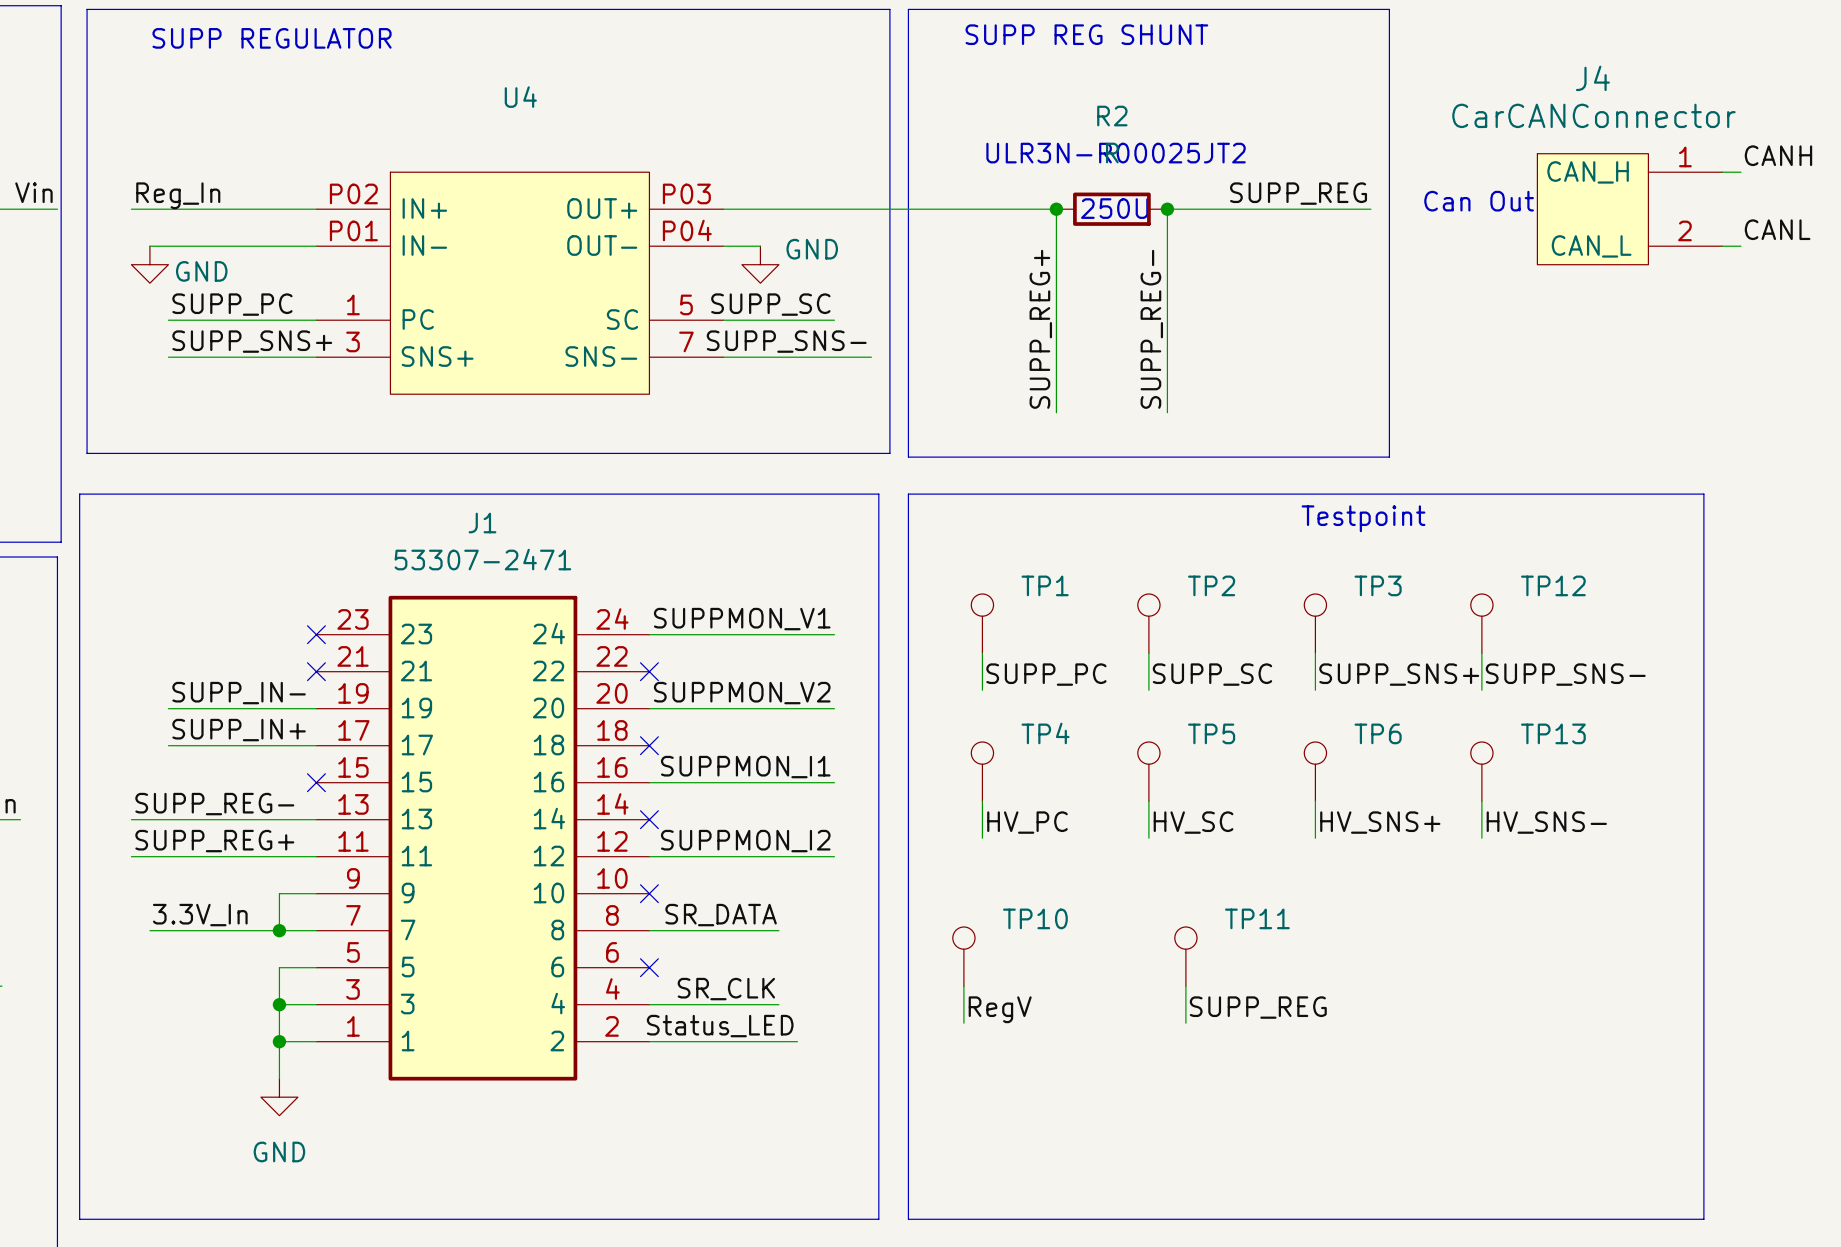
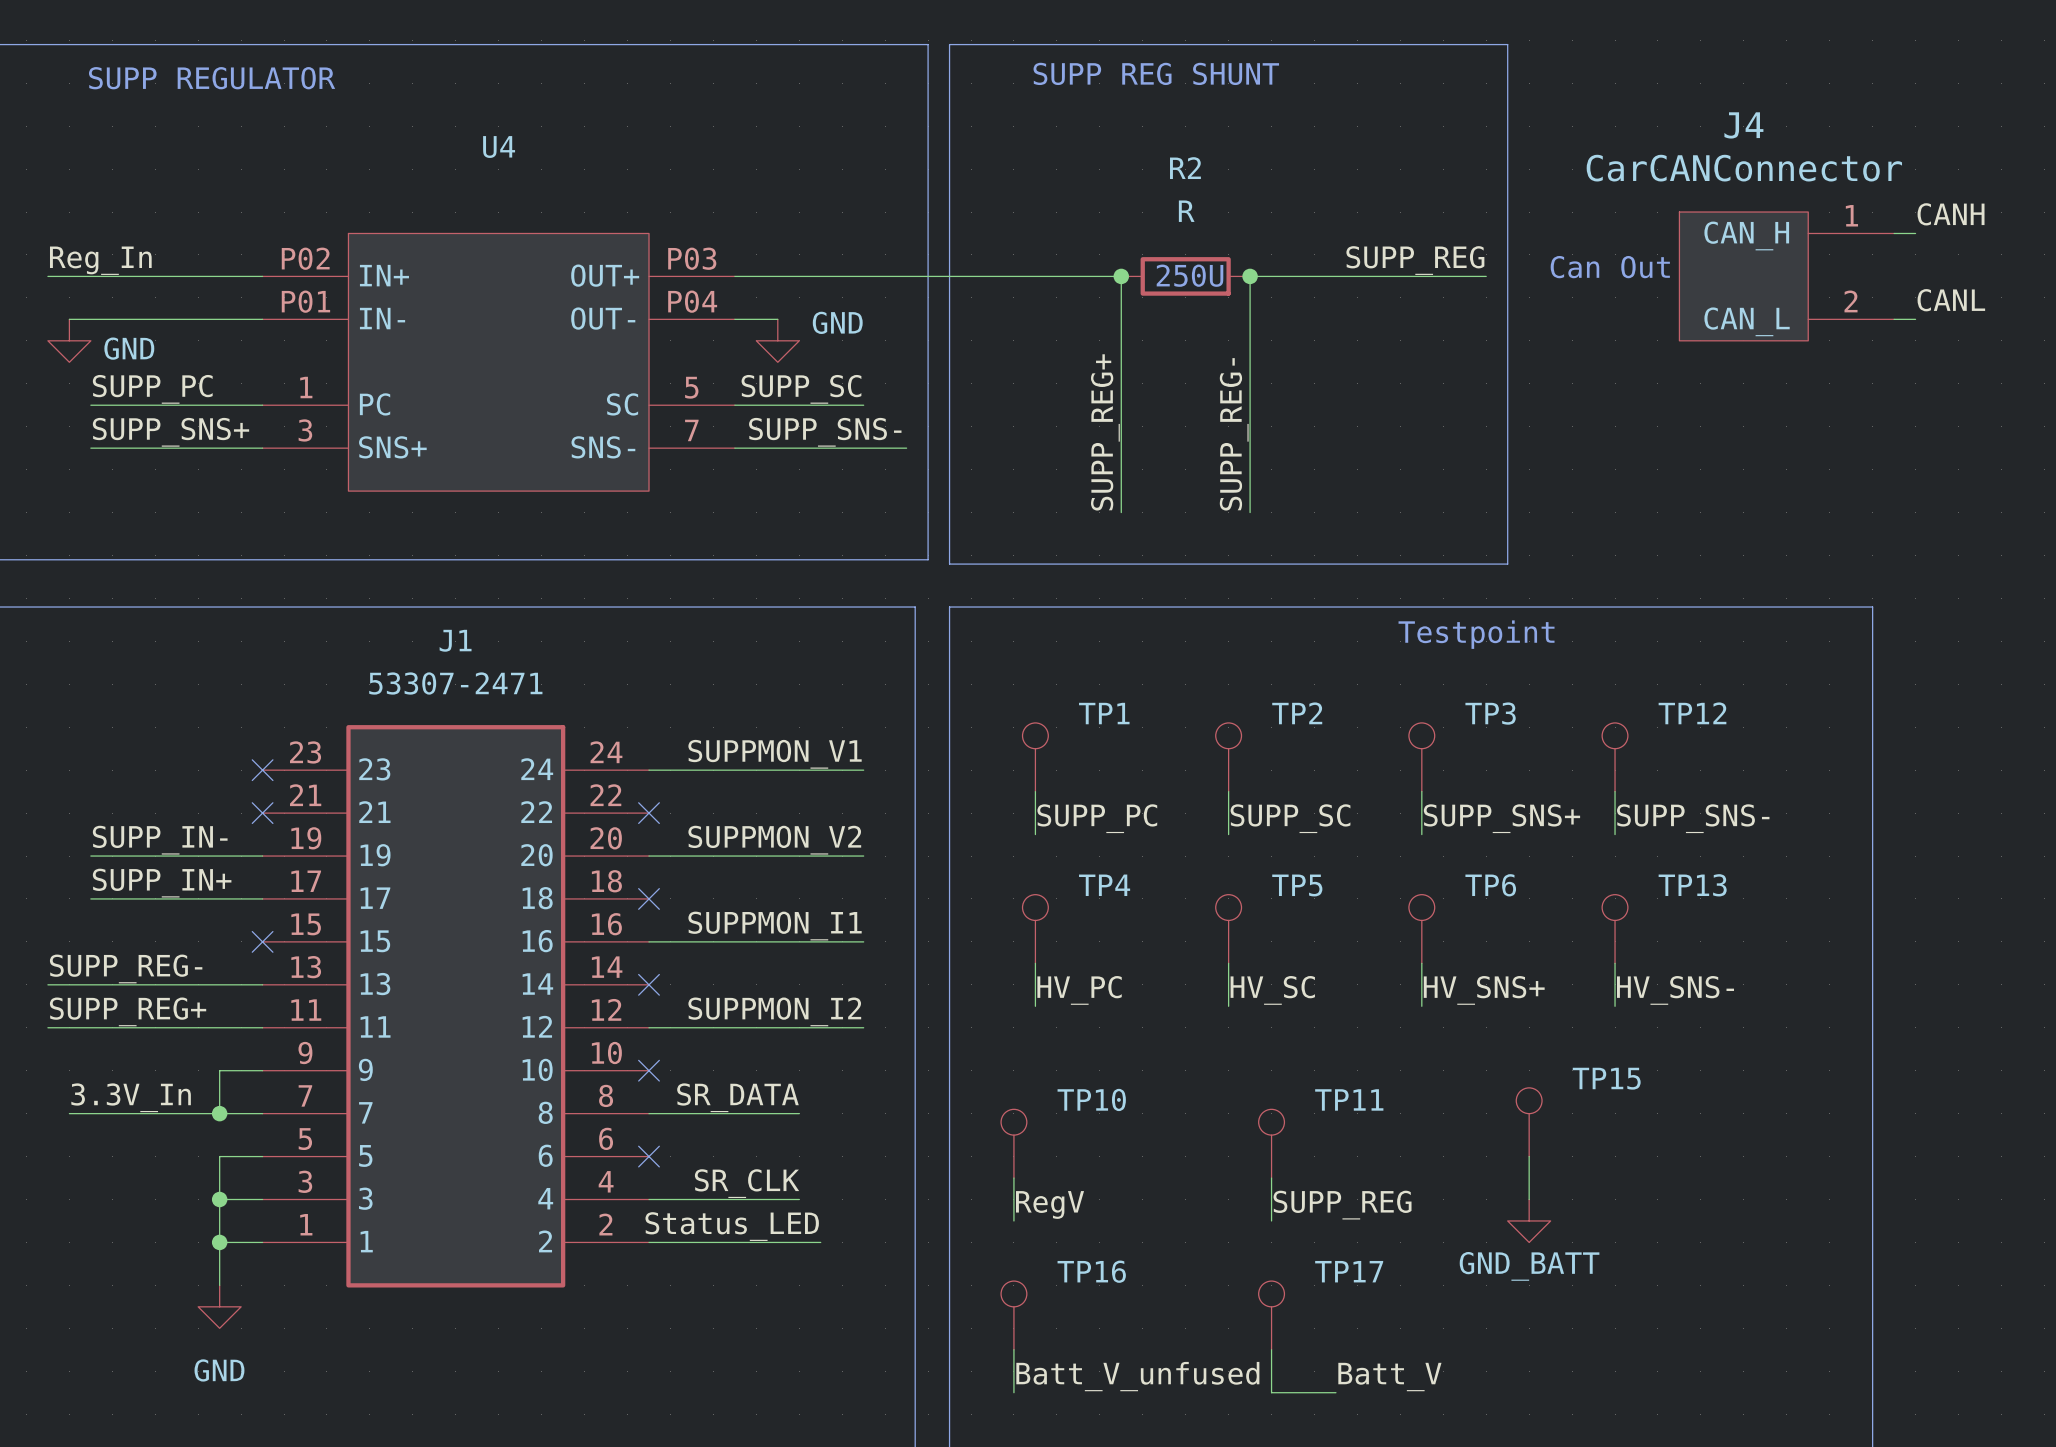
text: ULR3N-R00025JT2 (1116, 153) -> none
TP15: none -> (1529, 1122)
wire: none -> (1529, 1156) (1529, 1199)
power symbol: none -> GND_BATT (1529, 1220)
TP16: none -> (1013, 1315)
TP17: none -> (1271, 1315)
wire: none -> (1013, 1349) (1013, 1392)
wire: none -> (1271, 1349) (1271, 1392) (1335, 1392)
label: none -> Batt_V_unfused (1137, 1376)
label: none -> Batt_V (1389, 1377)

